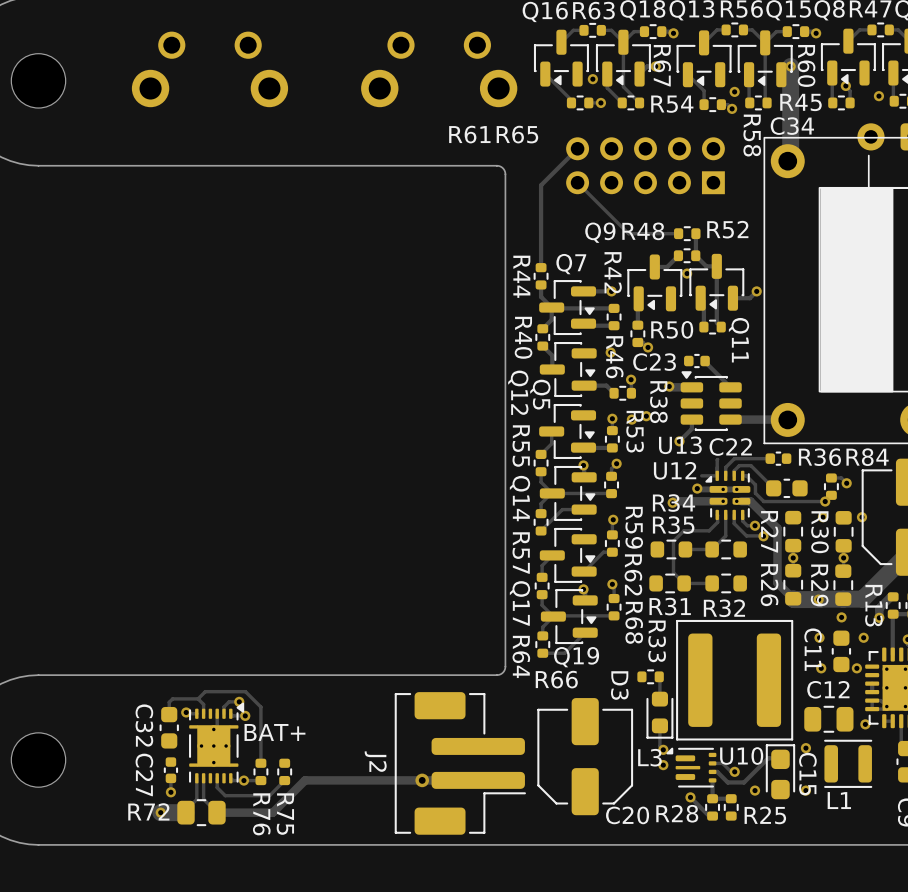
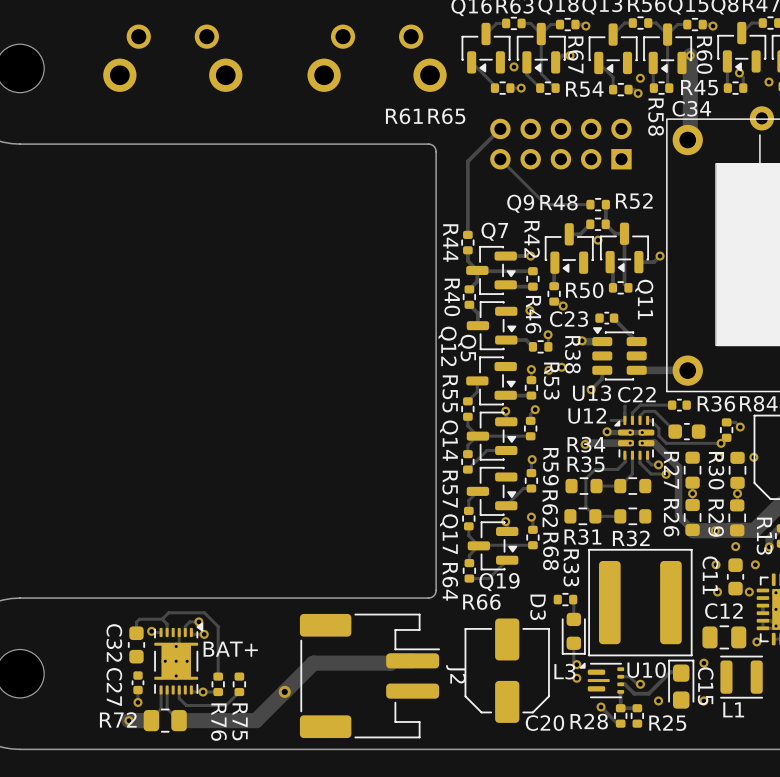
J2 footprint: [394, 692, 526, 835] -> [299, 613, 441, 739]
J2 name position: J2 (375, 761) -> J2 (455, 674)
via position: (422, 780) -> (284, 691)
track: (478, 780) (305, 780) (272, 812) -> (412, 660) (392, 660) (390, 663) (313, 663) (256, 720) (228, 720)
track width: thin (272, 812) (216, 812) -> thick (228, 720) (179, 720)

